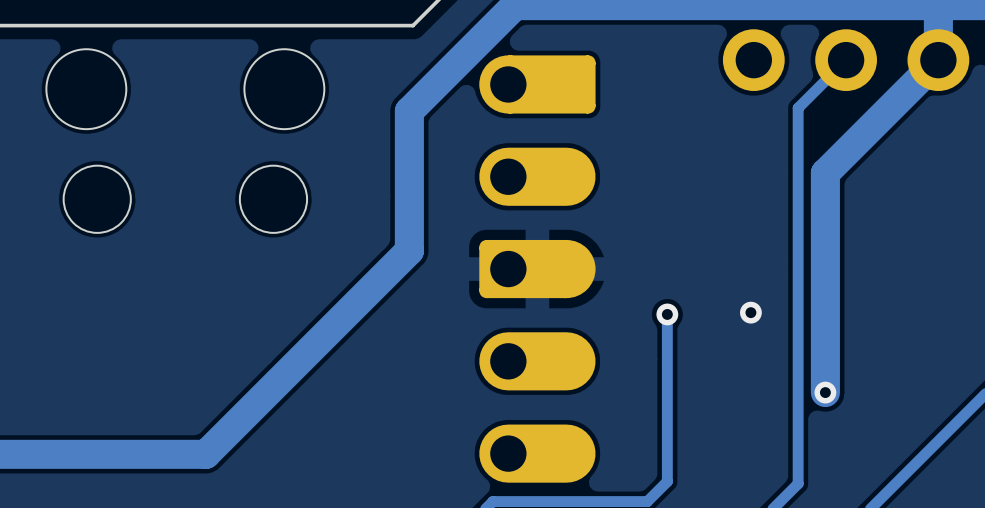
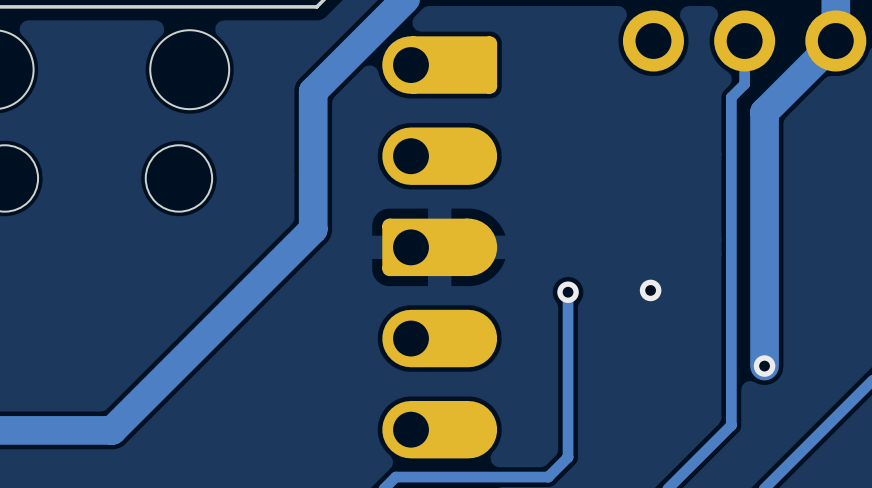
track: (846, 60) (798, 108) (798, 483) -> (744, 40) (744, 84) (731, 97) (731, 425) (697, 459)
track: (866, 132) (825, 173) (825, 392) -> (764, 112) (764, 366)
via position: (825, 392) -> (764, 366)

